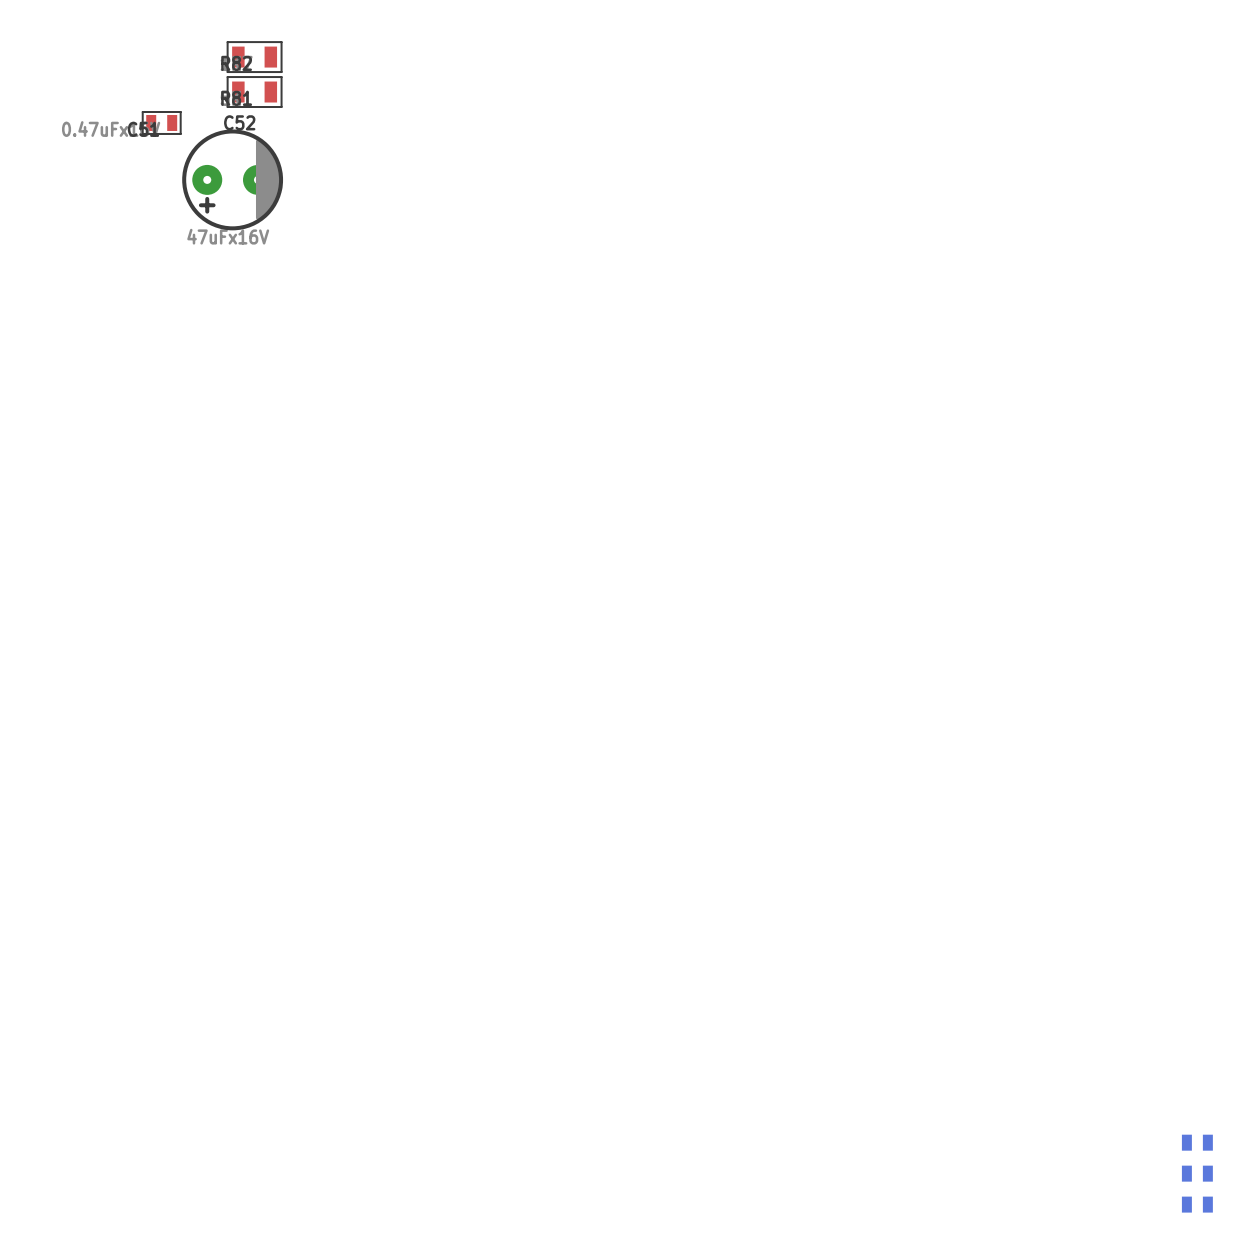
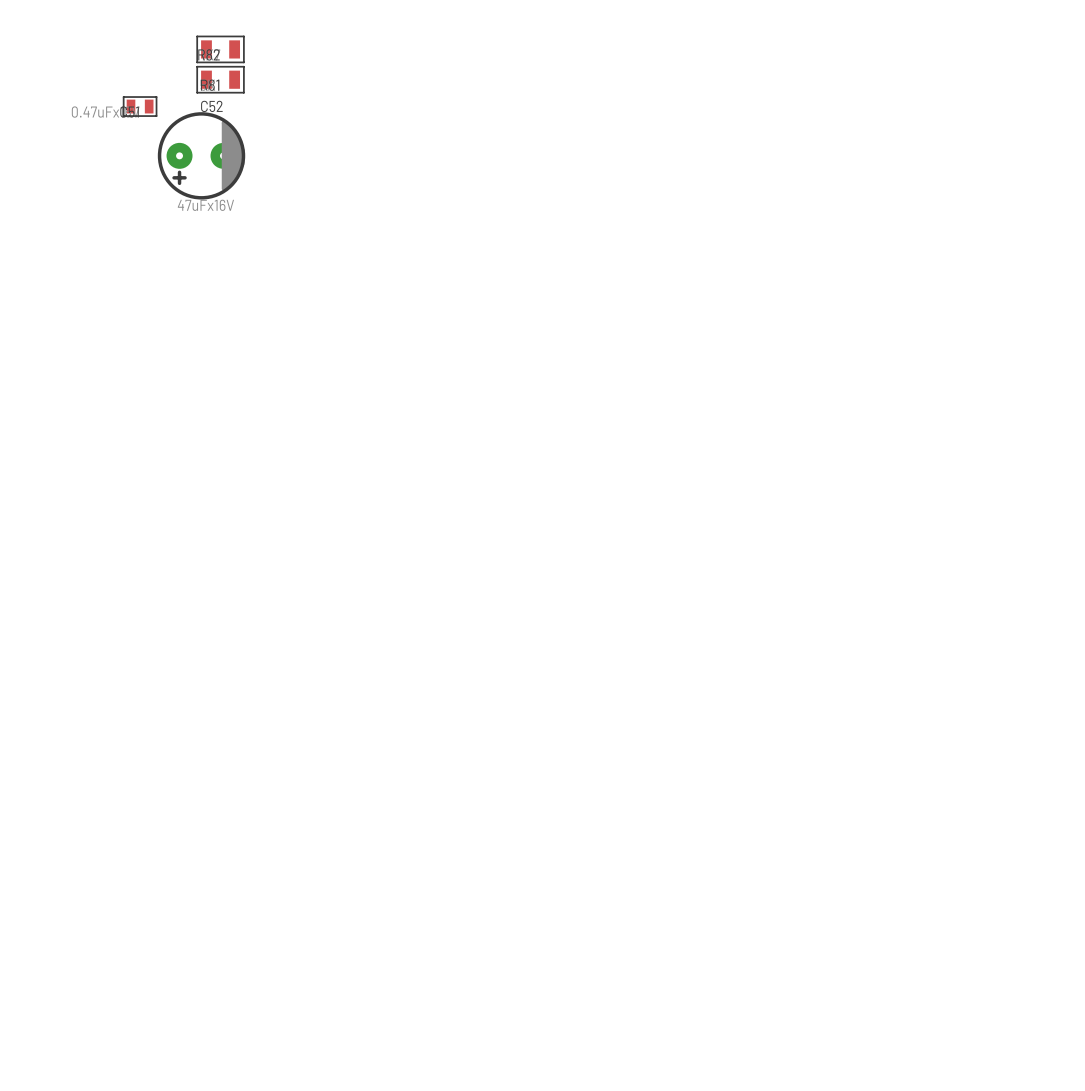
part: (1197, 1142) -> none
part: (1197, 1173) -> none
part: (1197, 1204) -> none

